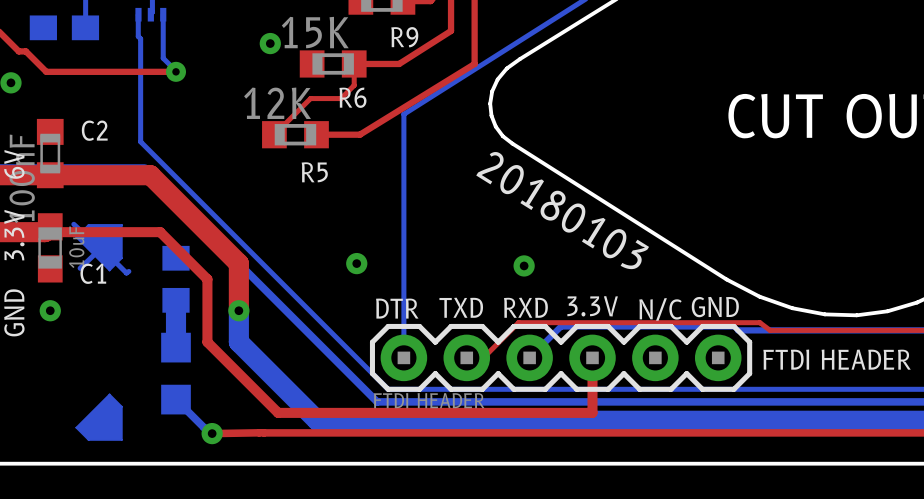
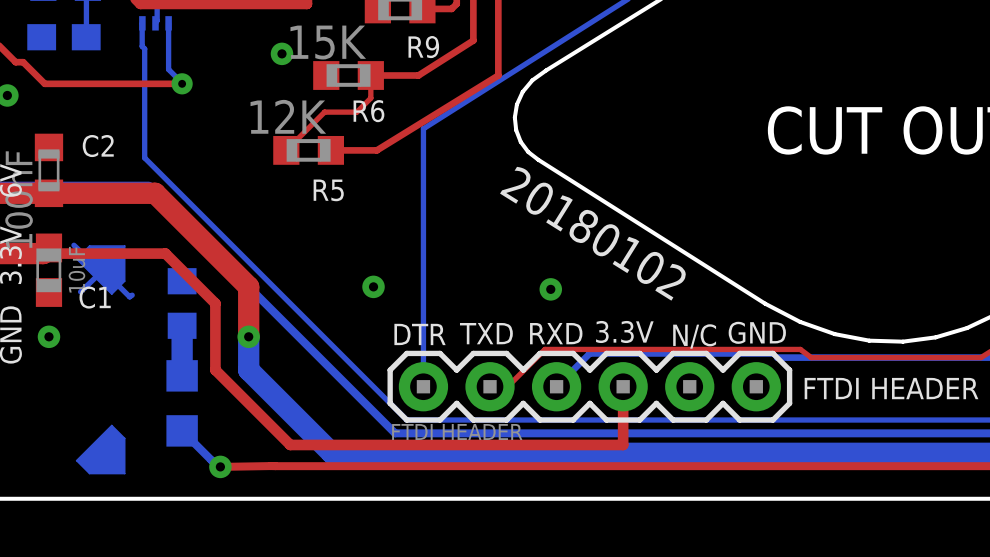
text: 20180103 (562, 210) -> 20180102 (593, 233)

